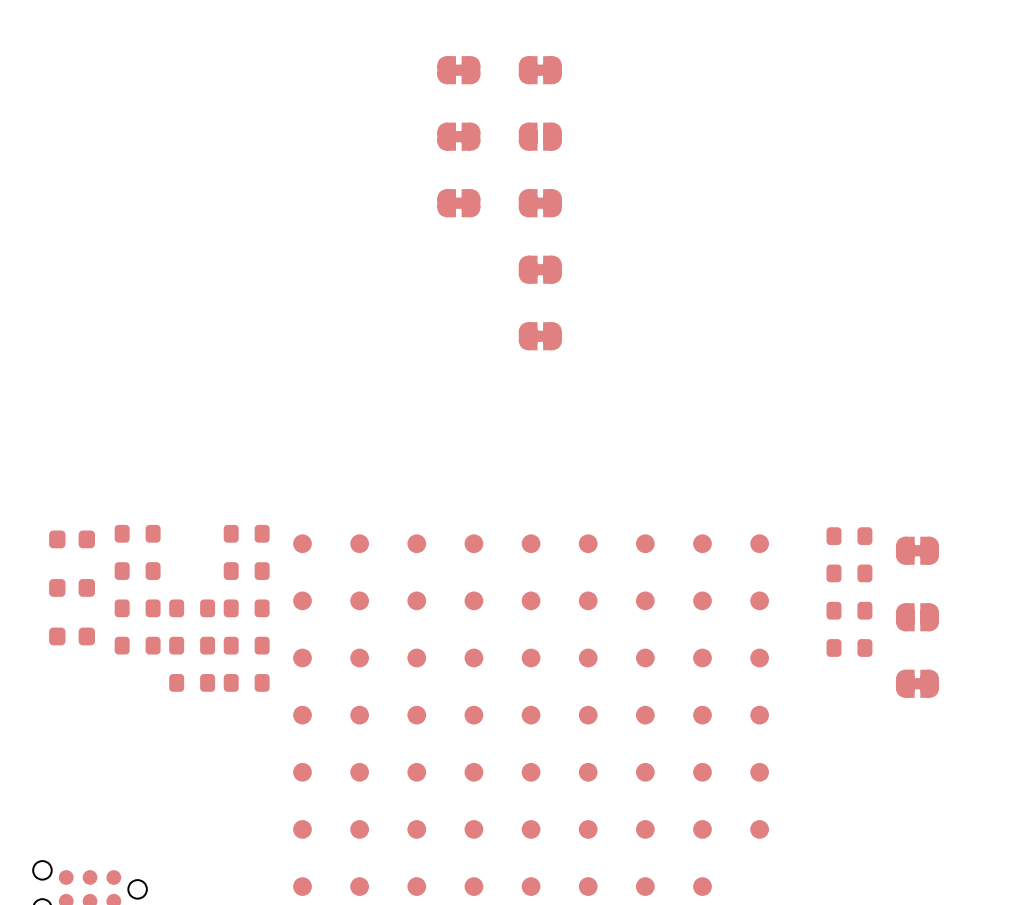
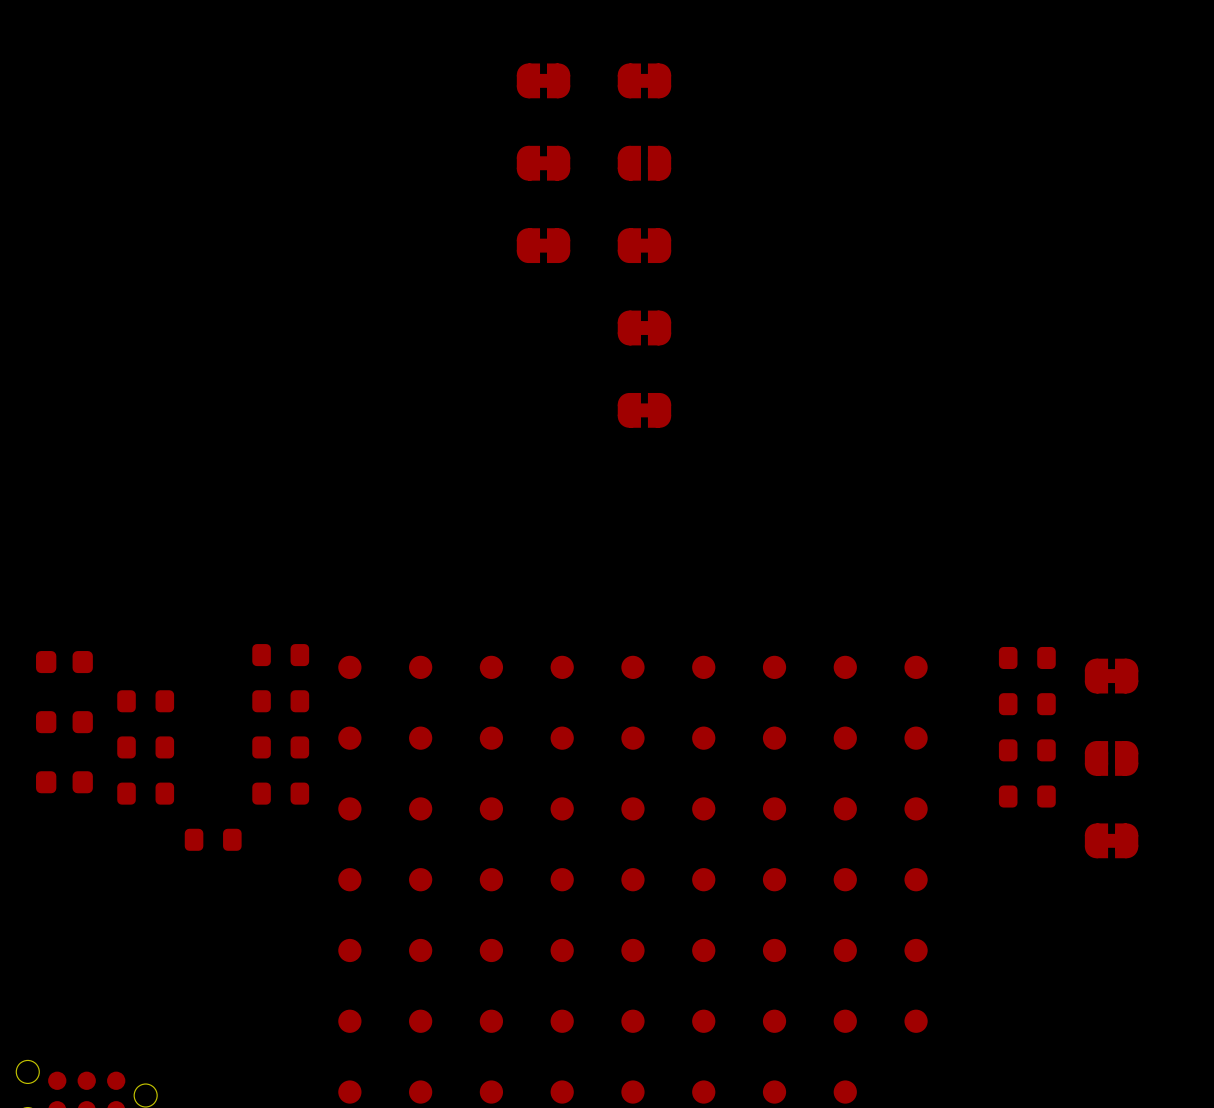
part: (137, 533) -> none
part: (192, 608) -> none
part: (192, 645) -> none
part: (246, 682) -> none

